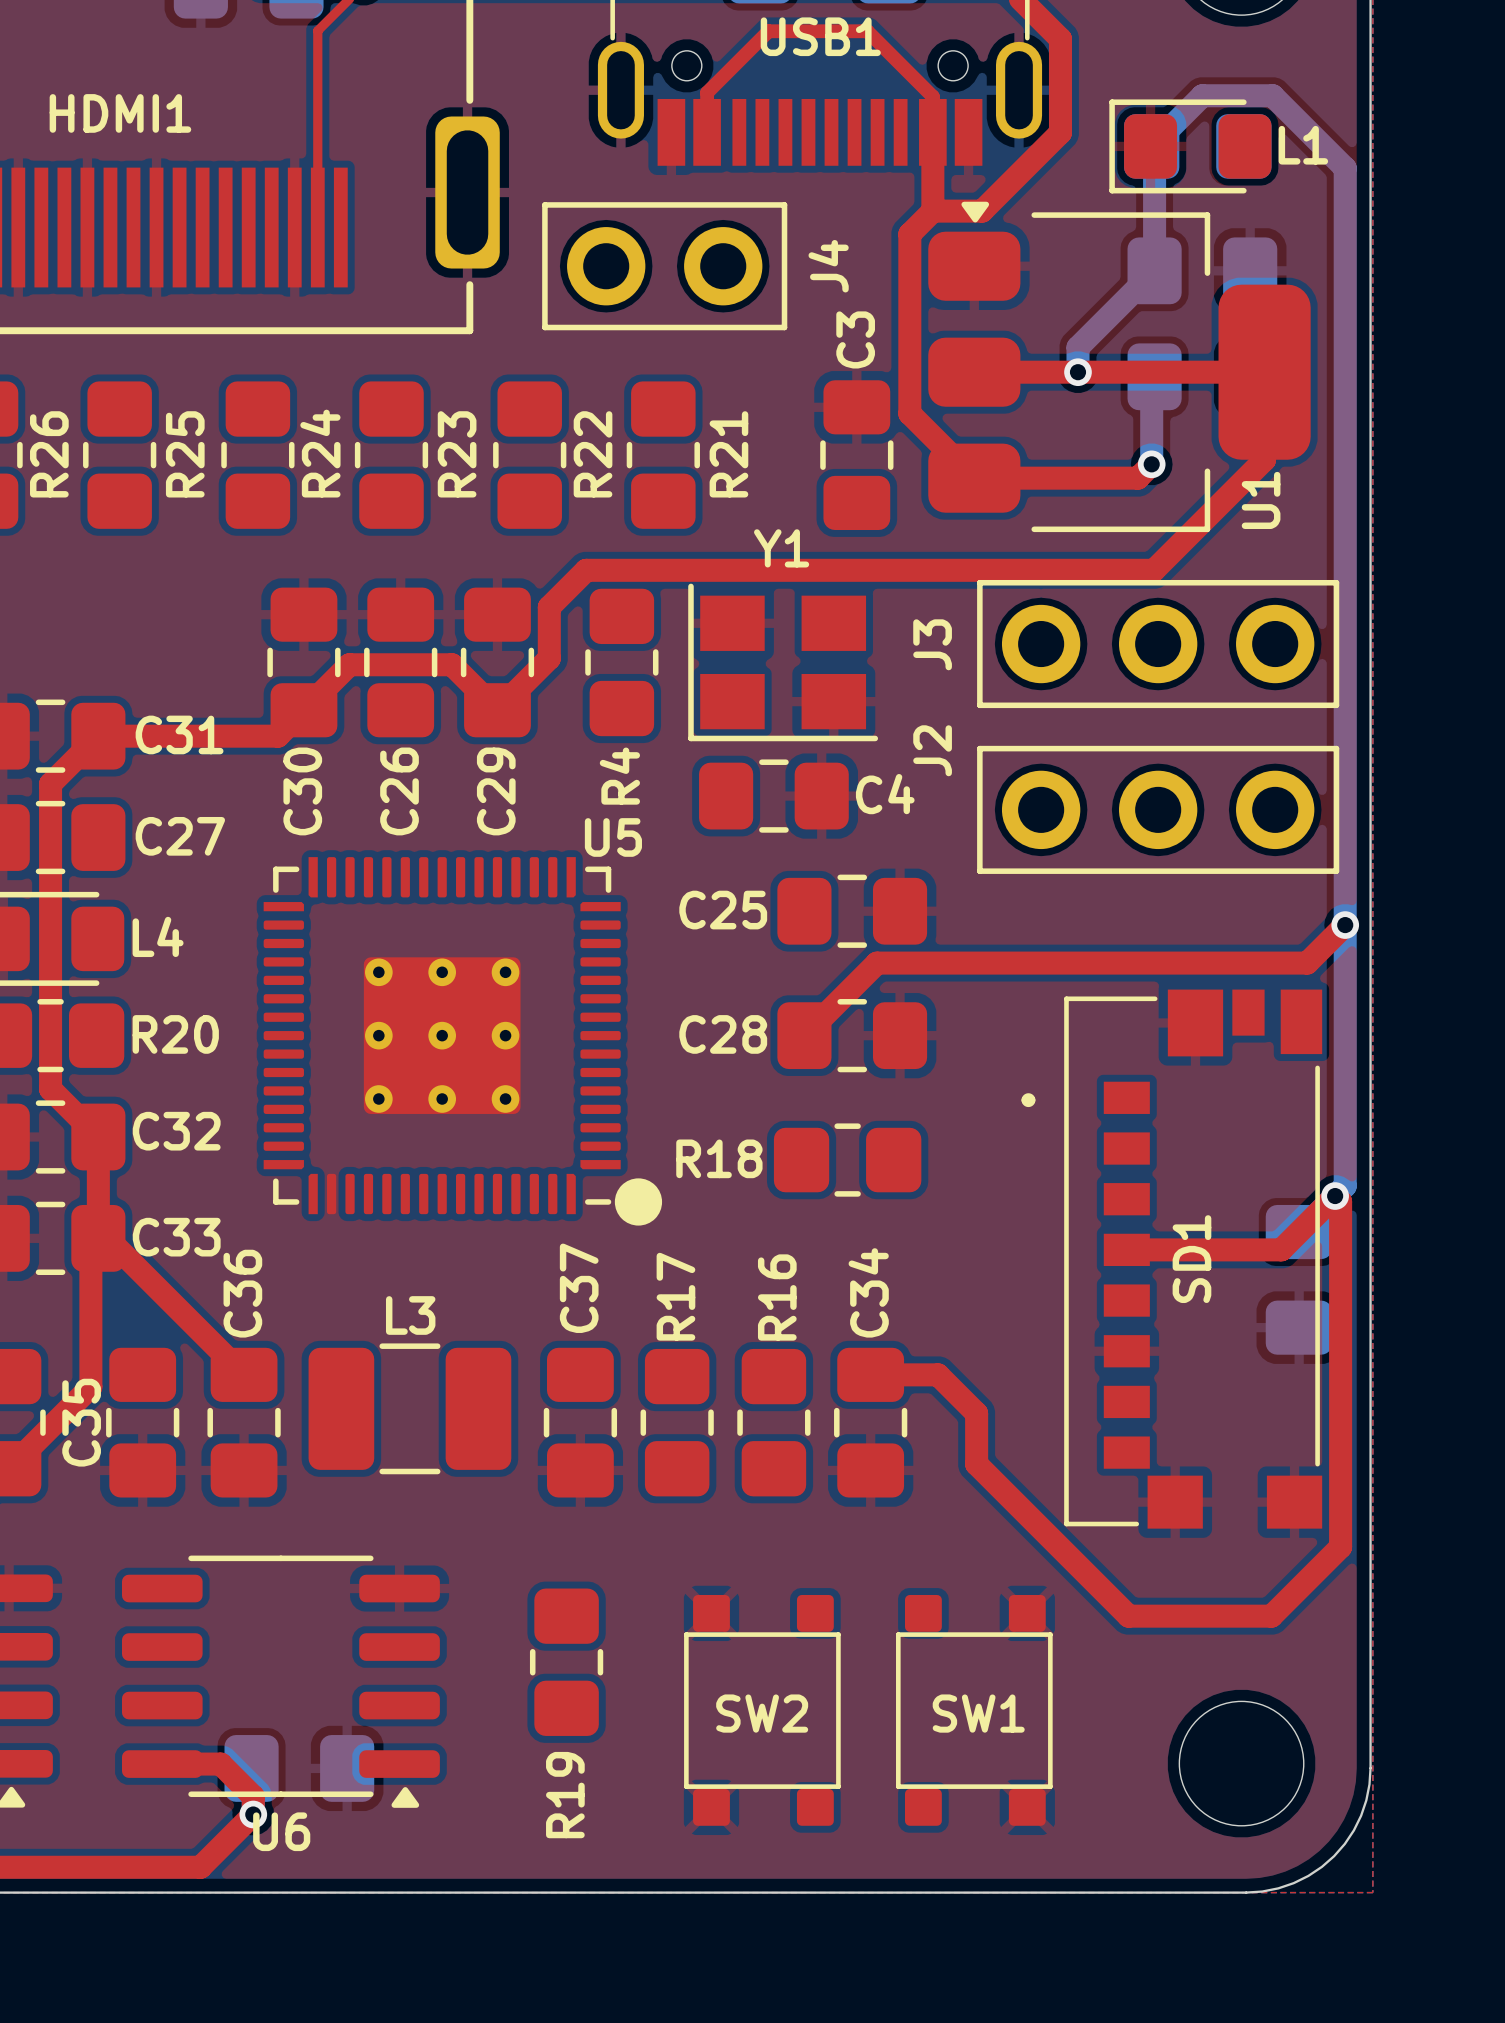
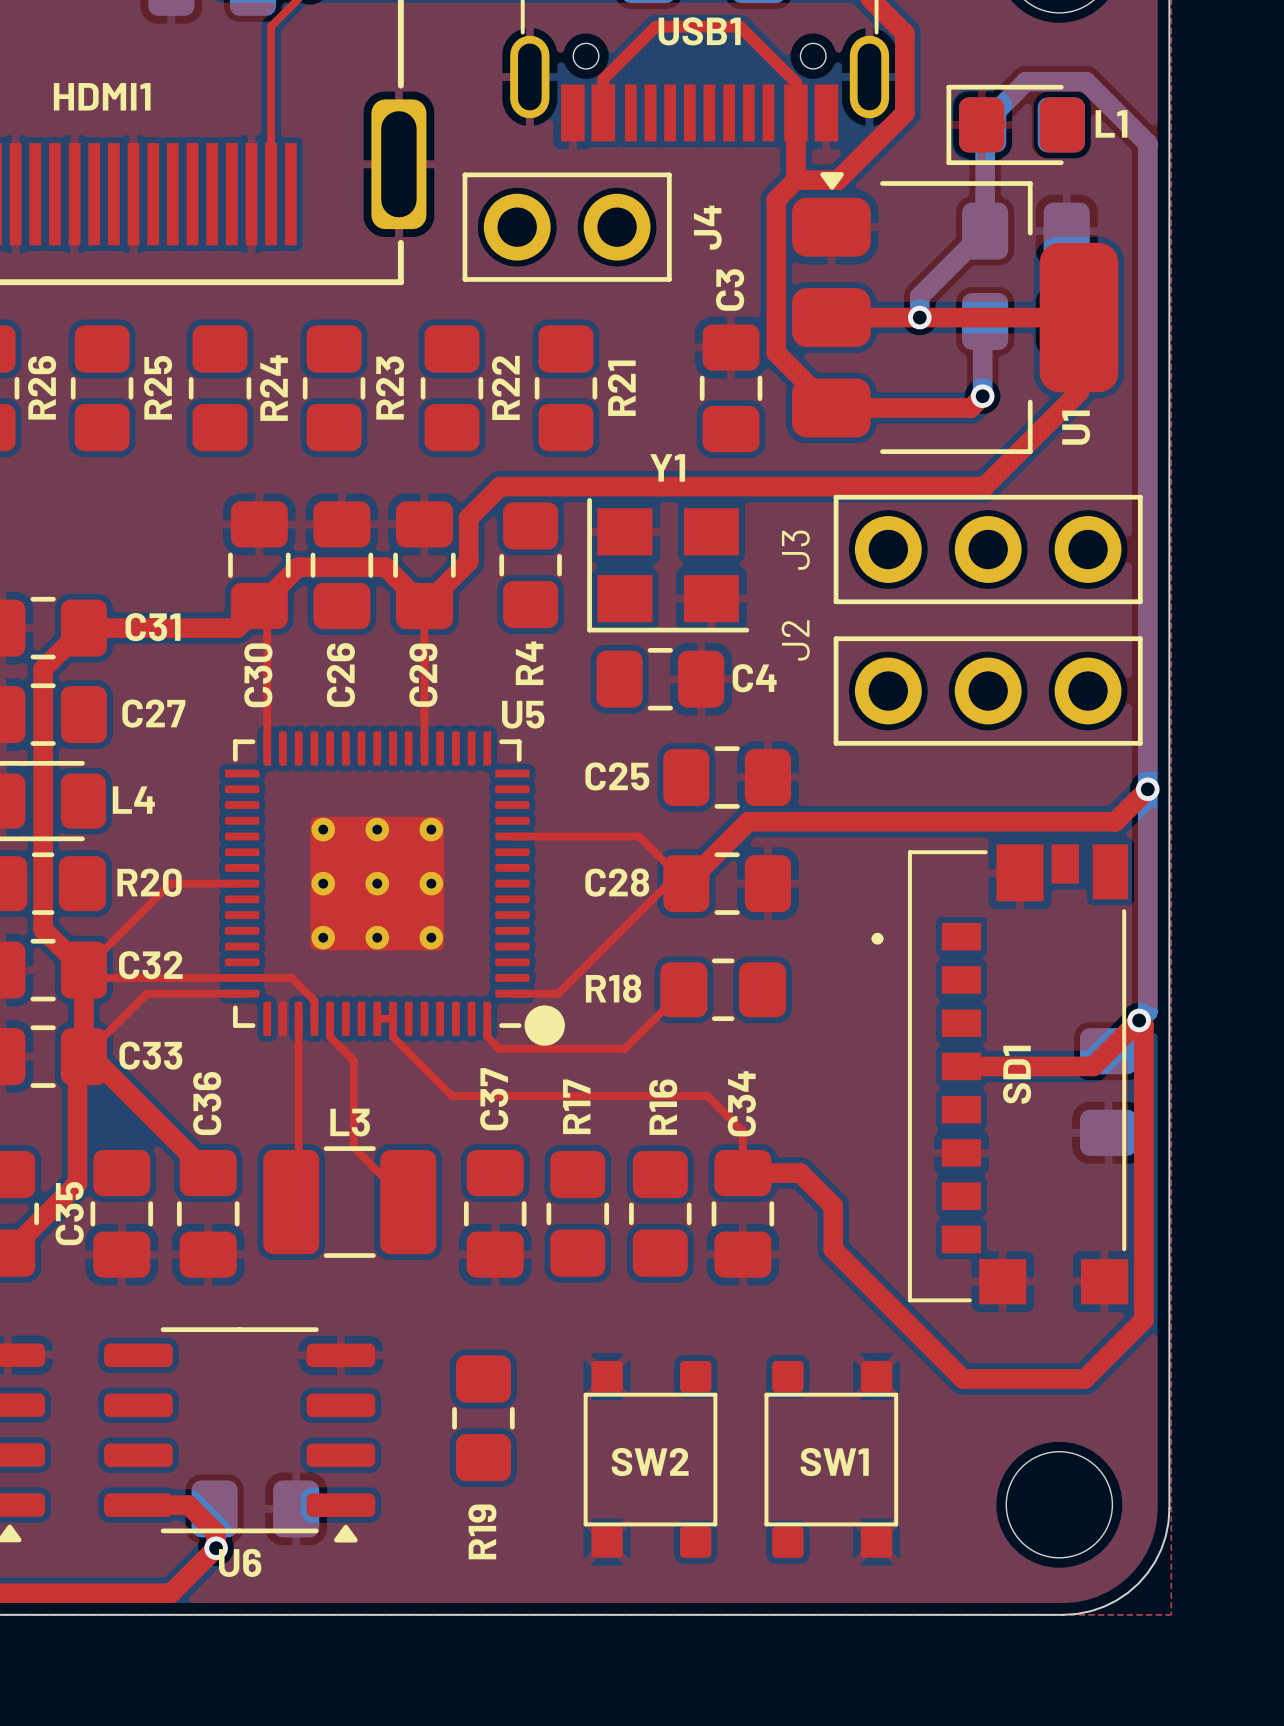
top track: none -> (259, 606) (267, 613) (267, 748)
top track: none -> (424, 606) (424, 748)
top track: none -> (512, 836) (639, 836) (686, 883) (668, 883) (558, 993) (512, 993)
top track: none -> (242, 883) (170, 883) (83, 970) (91, 977) (291, 977) (314, 1000) (314, 1018)
top track: none -> (683, 989) (624, 1048) (499, 1048) (487, 1036) (487, 1018)
top track: none -> (242, 993) (146, 993) (83, 1056)
top track: none -> (298, 1018) (298, 1194) (291, 1202)
top track: none -> (330, 1018) (330, 1036) (353, 1060) (353, 1147) (408, 1202)
top track: none -> (377, 1018) (393, 1018) (393, 1036) (451, 1095) (707, 1095) (742, 1131) (742, 1173)

